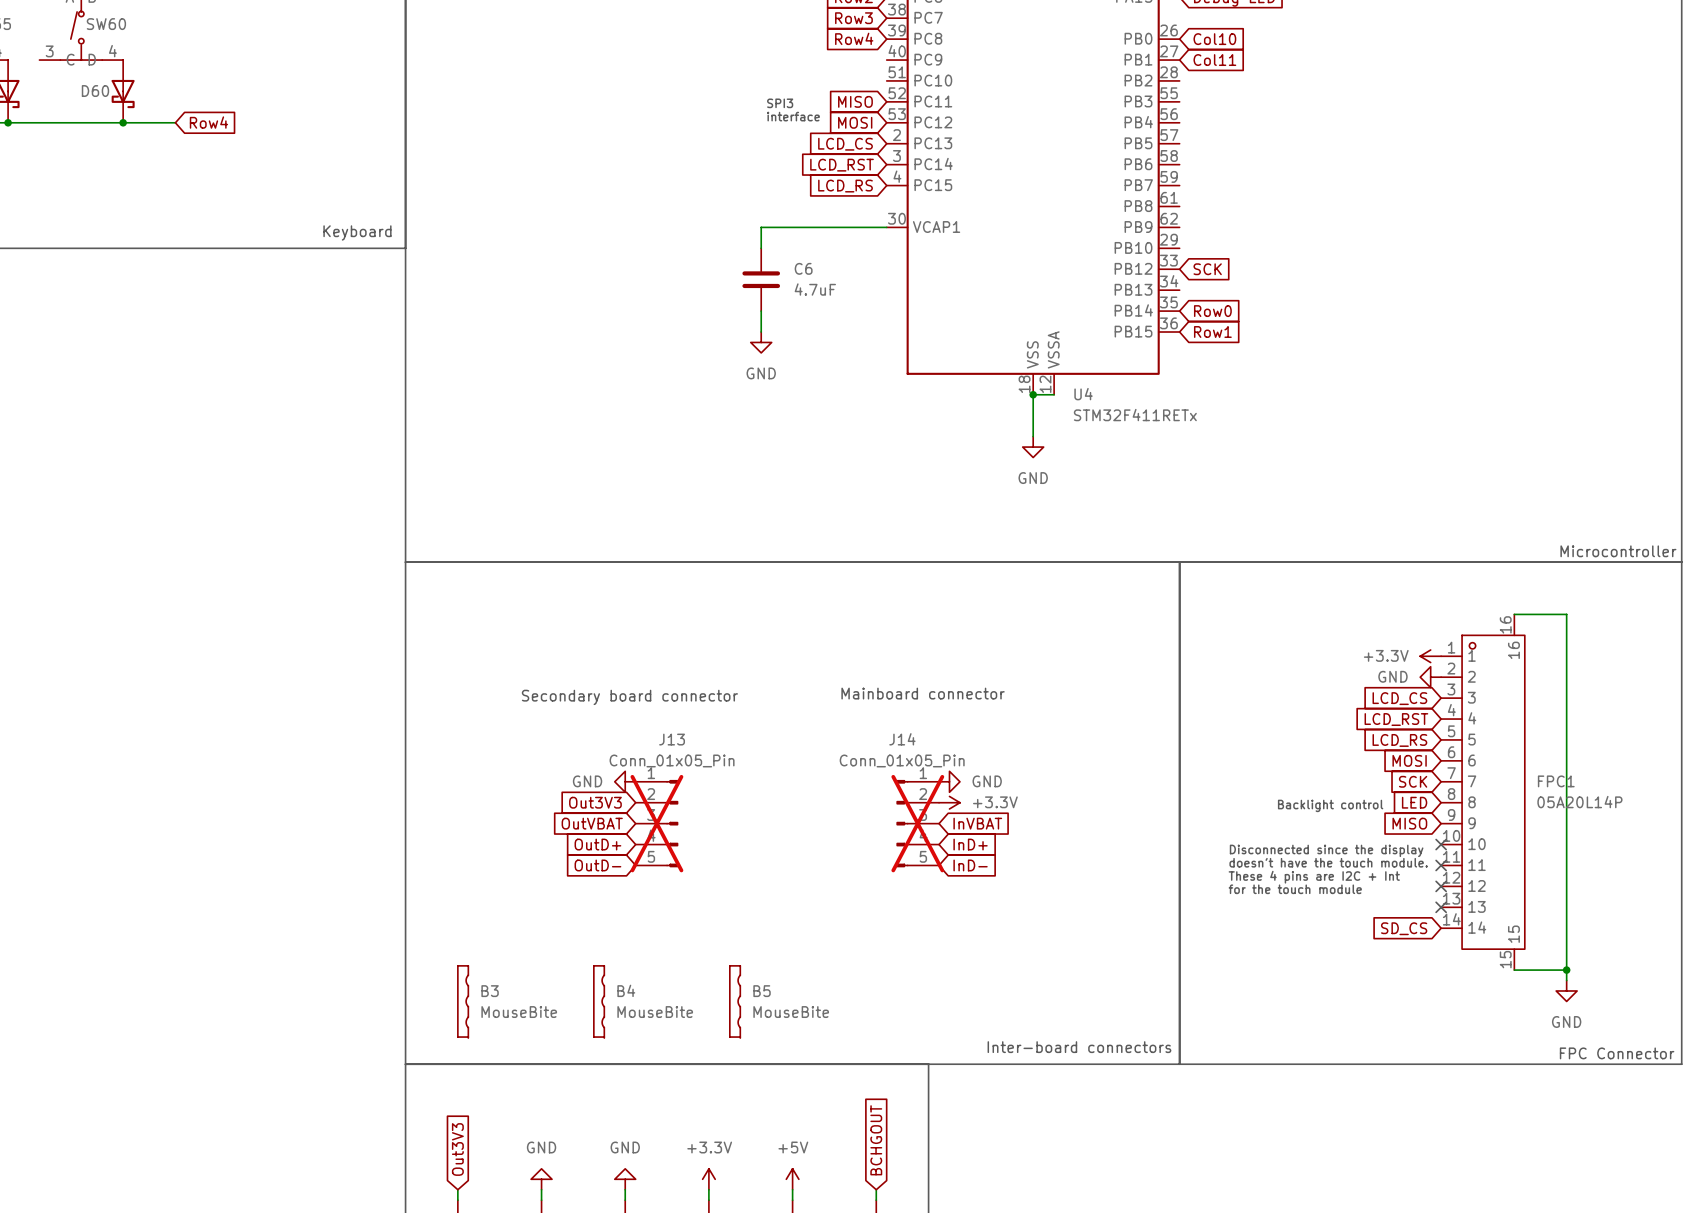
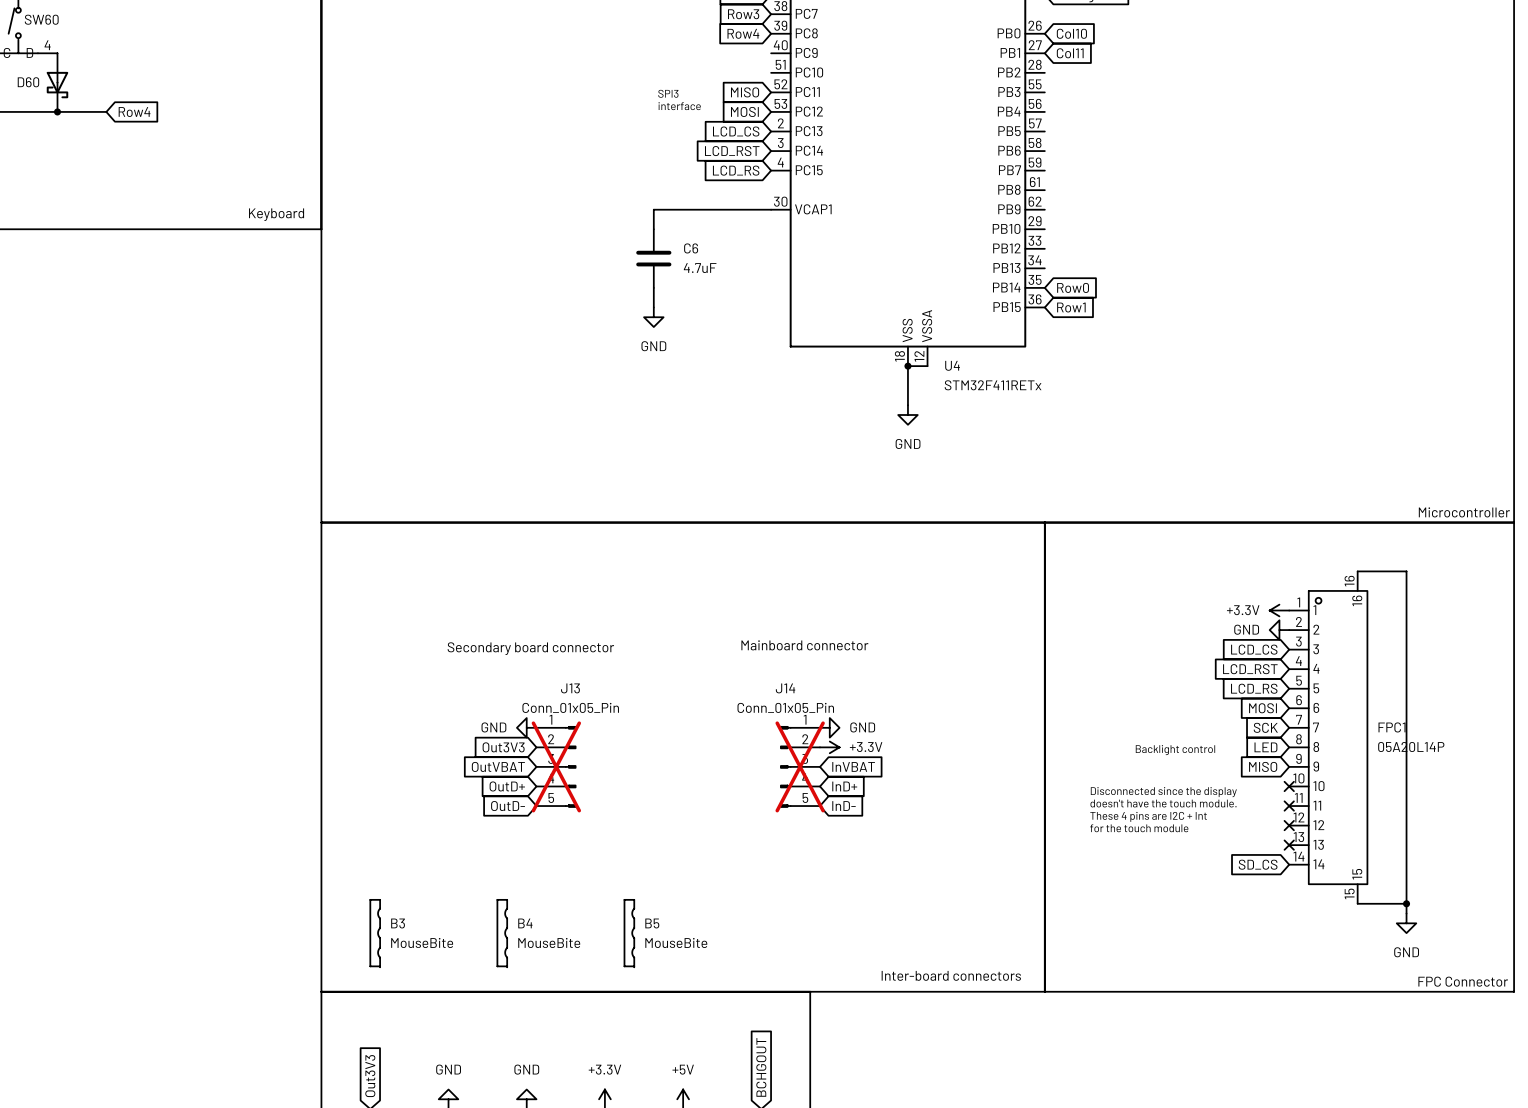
global label: SCK (1207, 269) -> none

